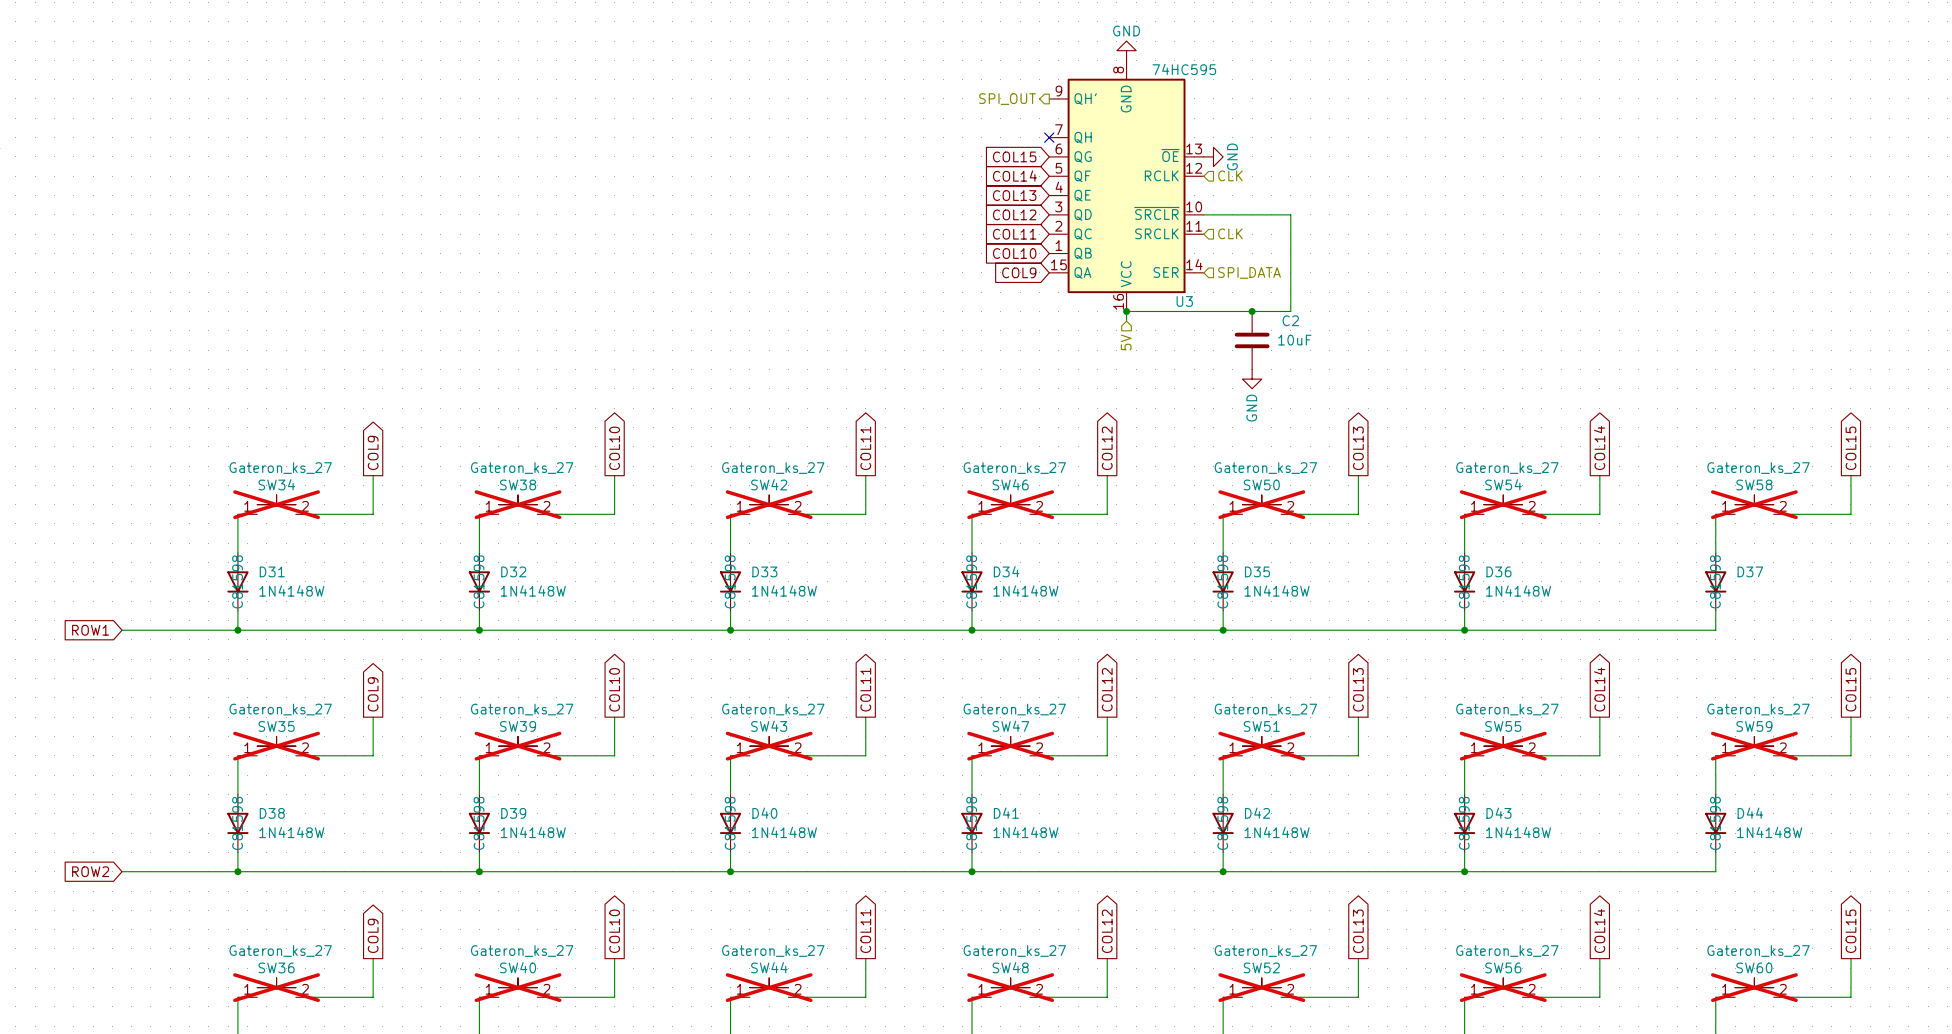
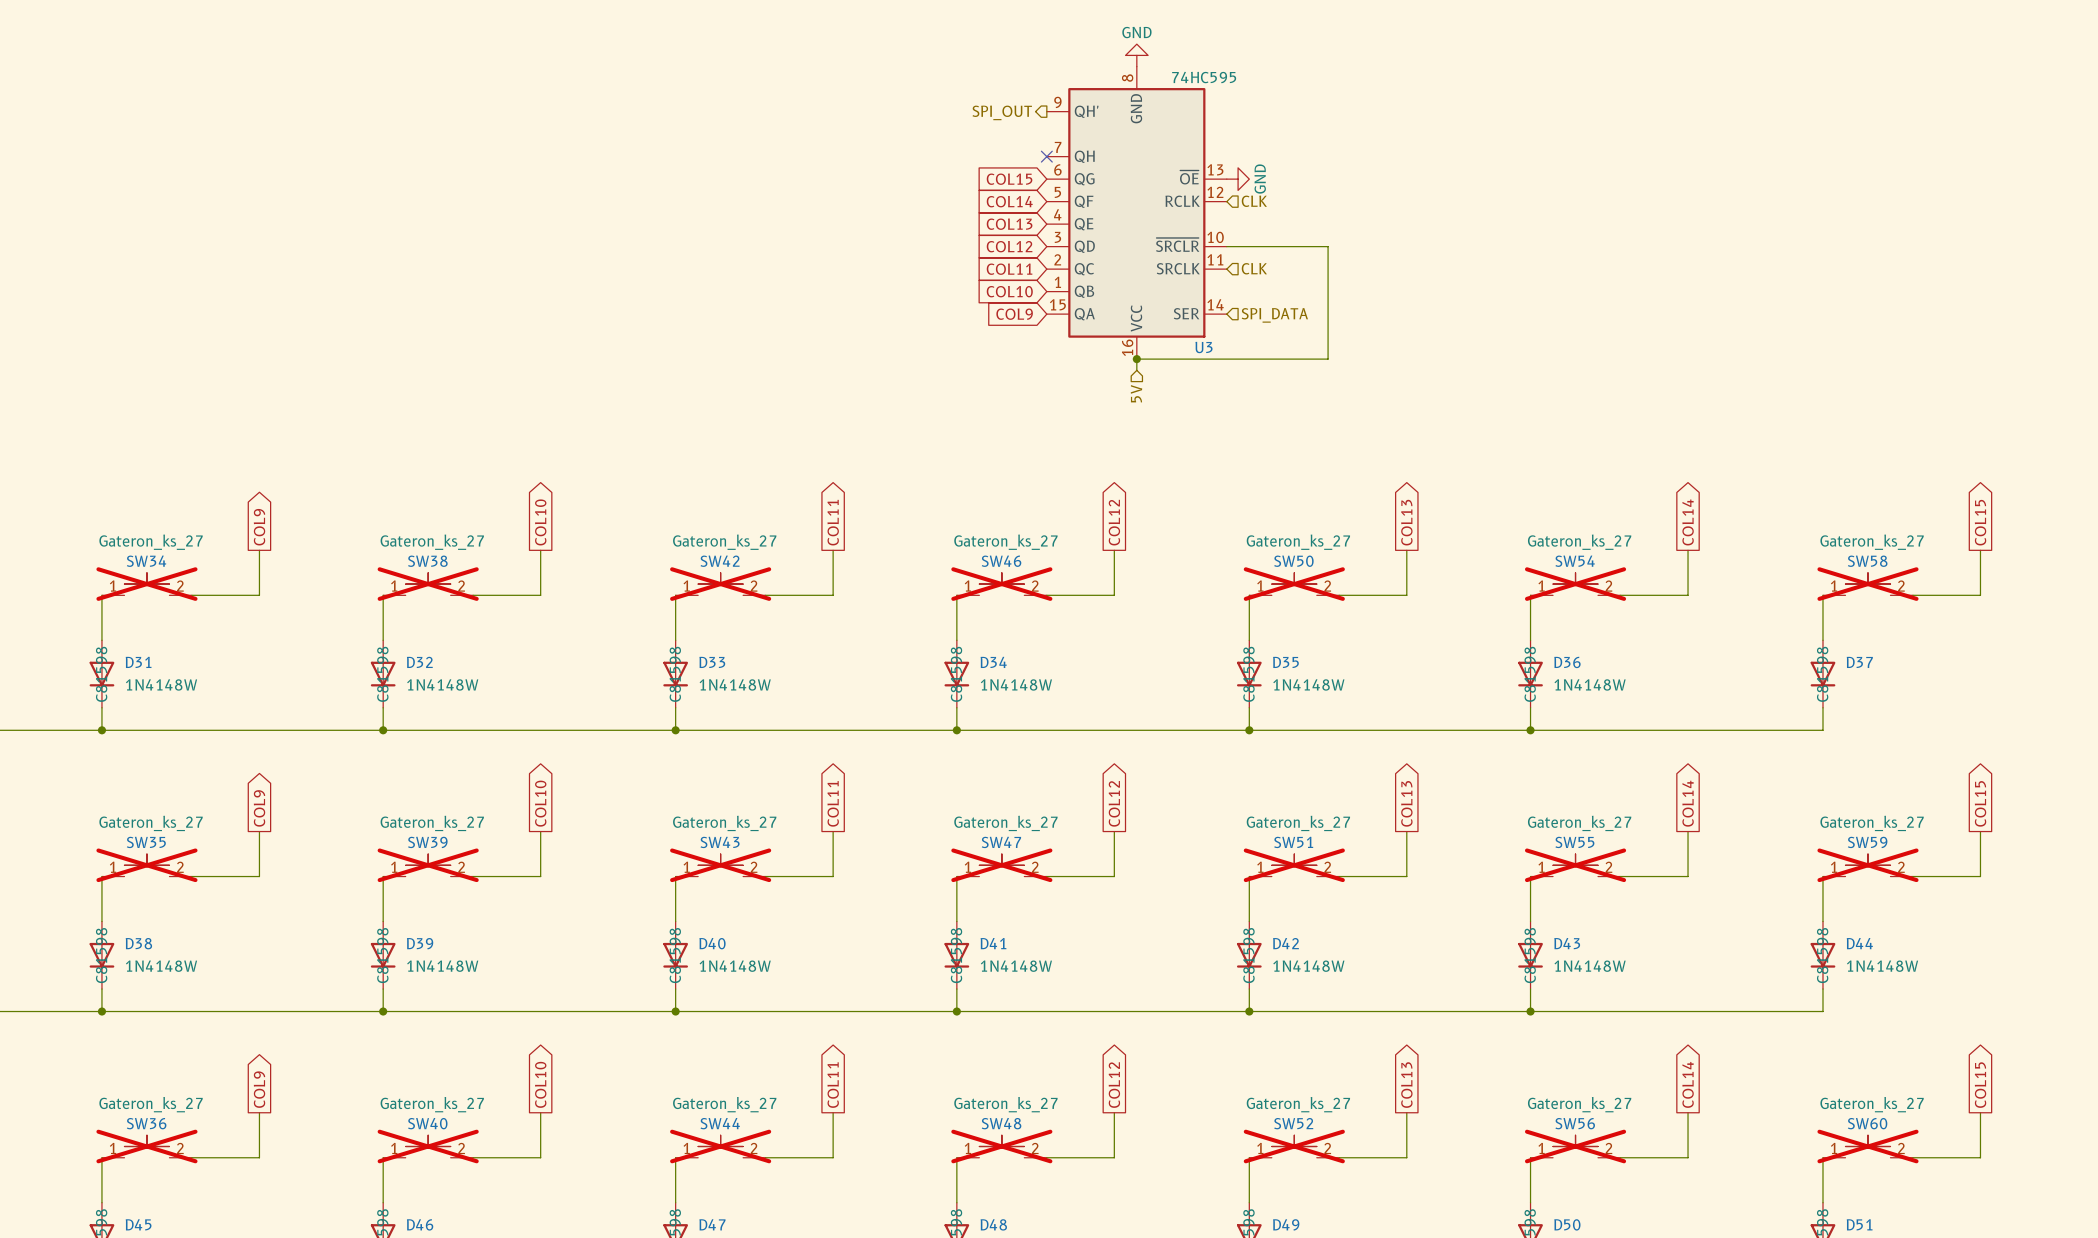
junction: (1252, 311) -> none
C2: 10uF (1252, 340) -> none
power symbol: GND (1252, 379) -> none

